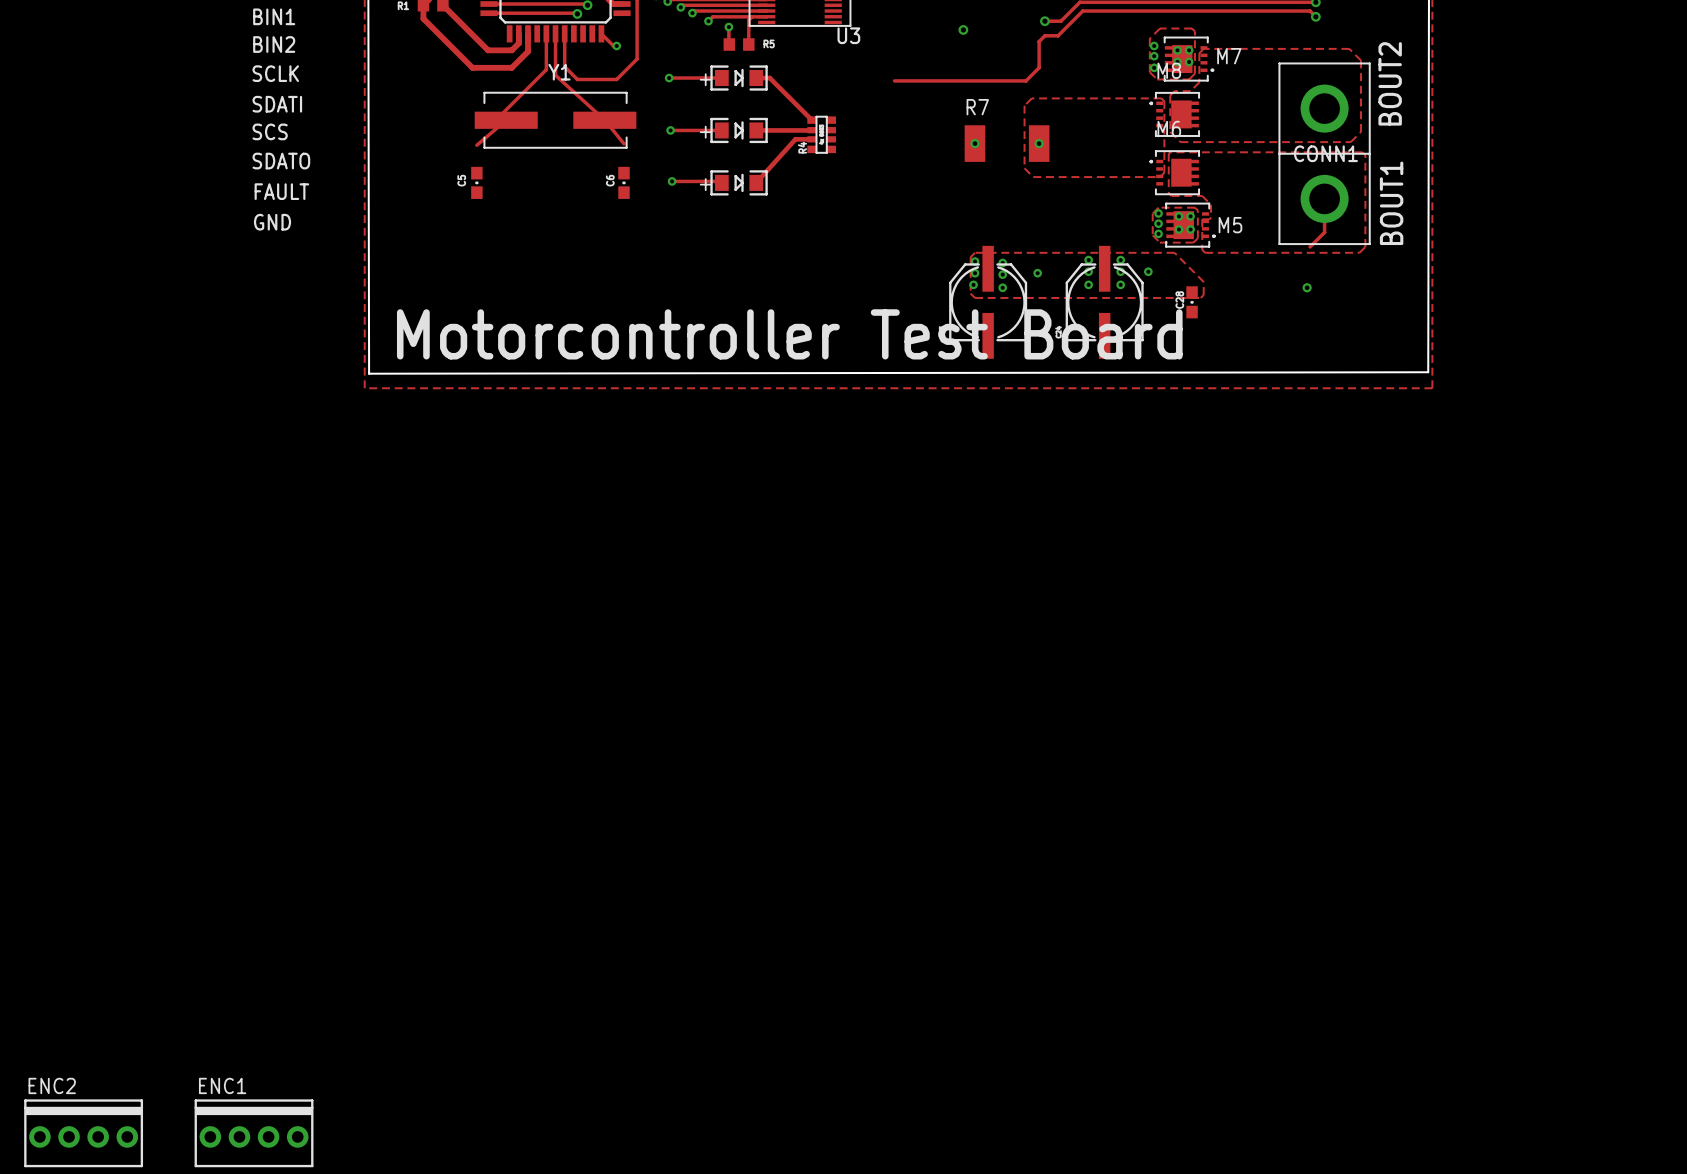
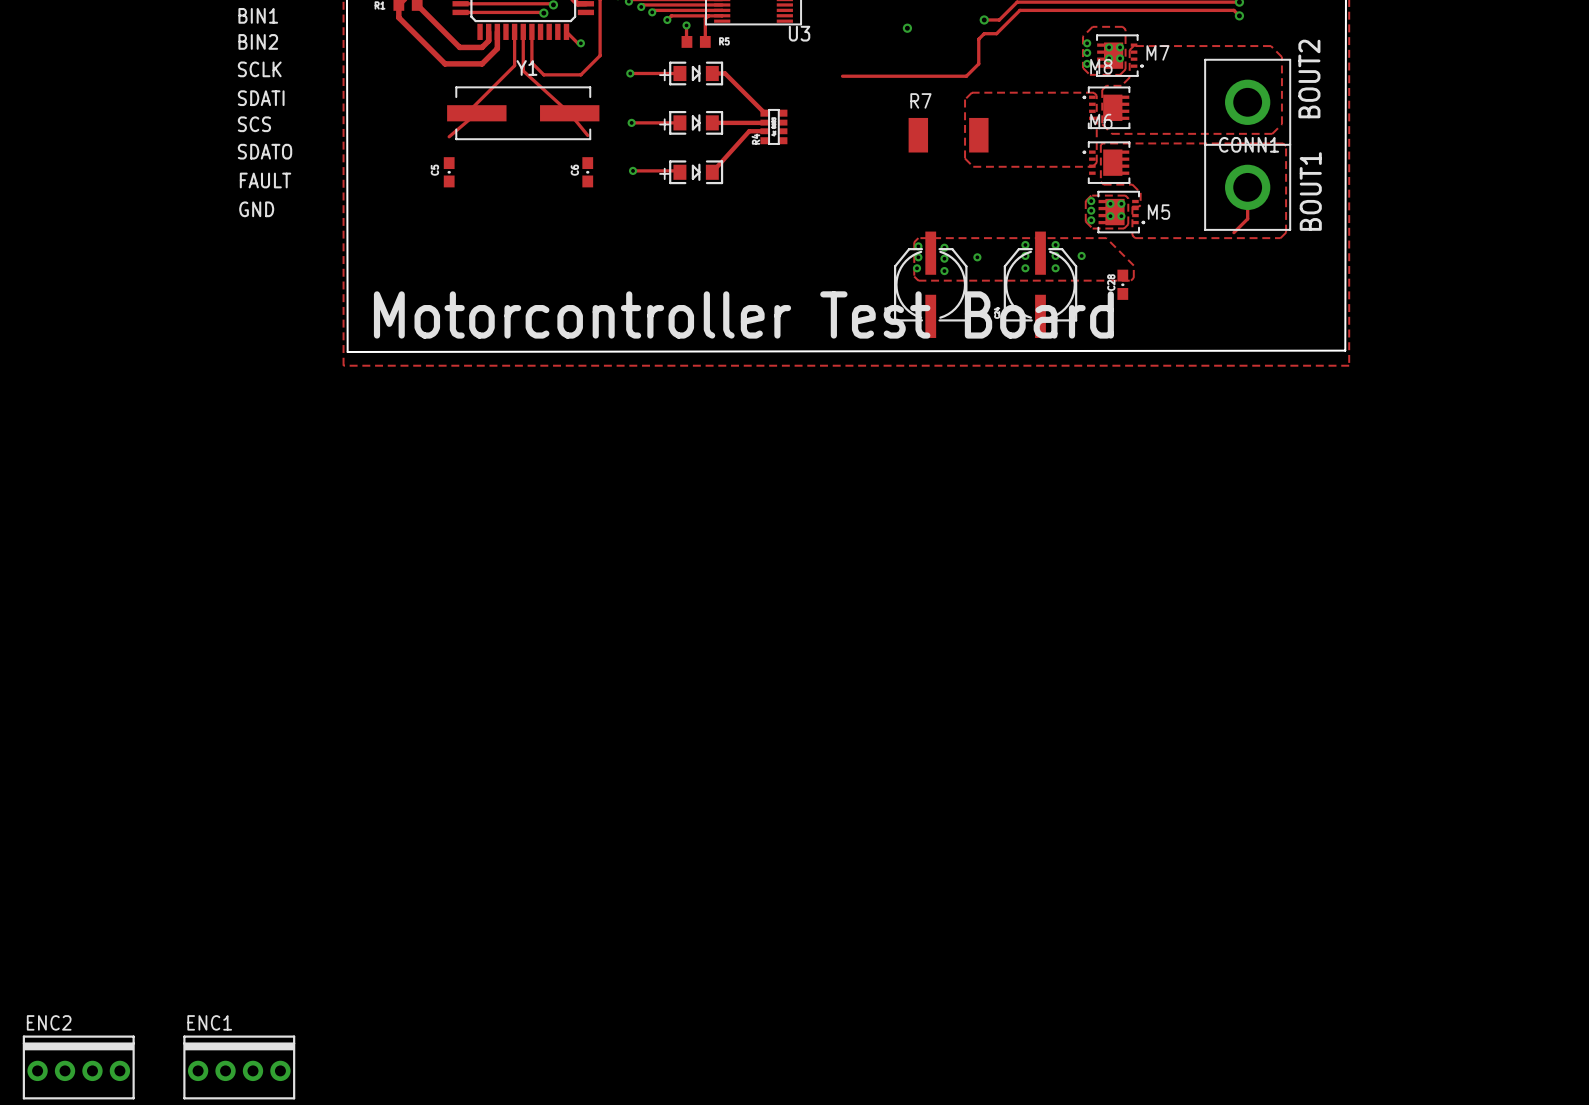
via: (975, 143) -> none
via: (1039, 143) -> none
via: (1307, 287) -> none

